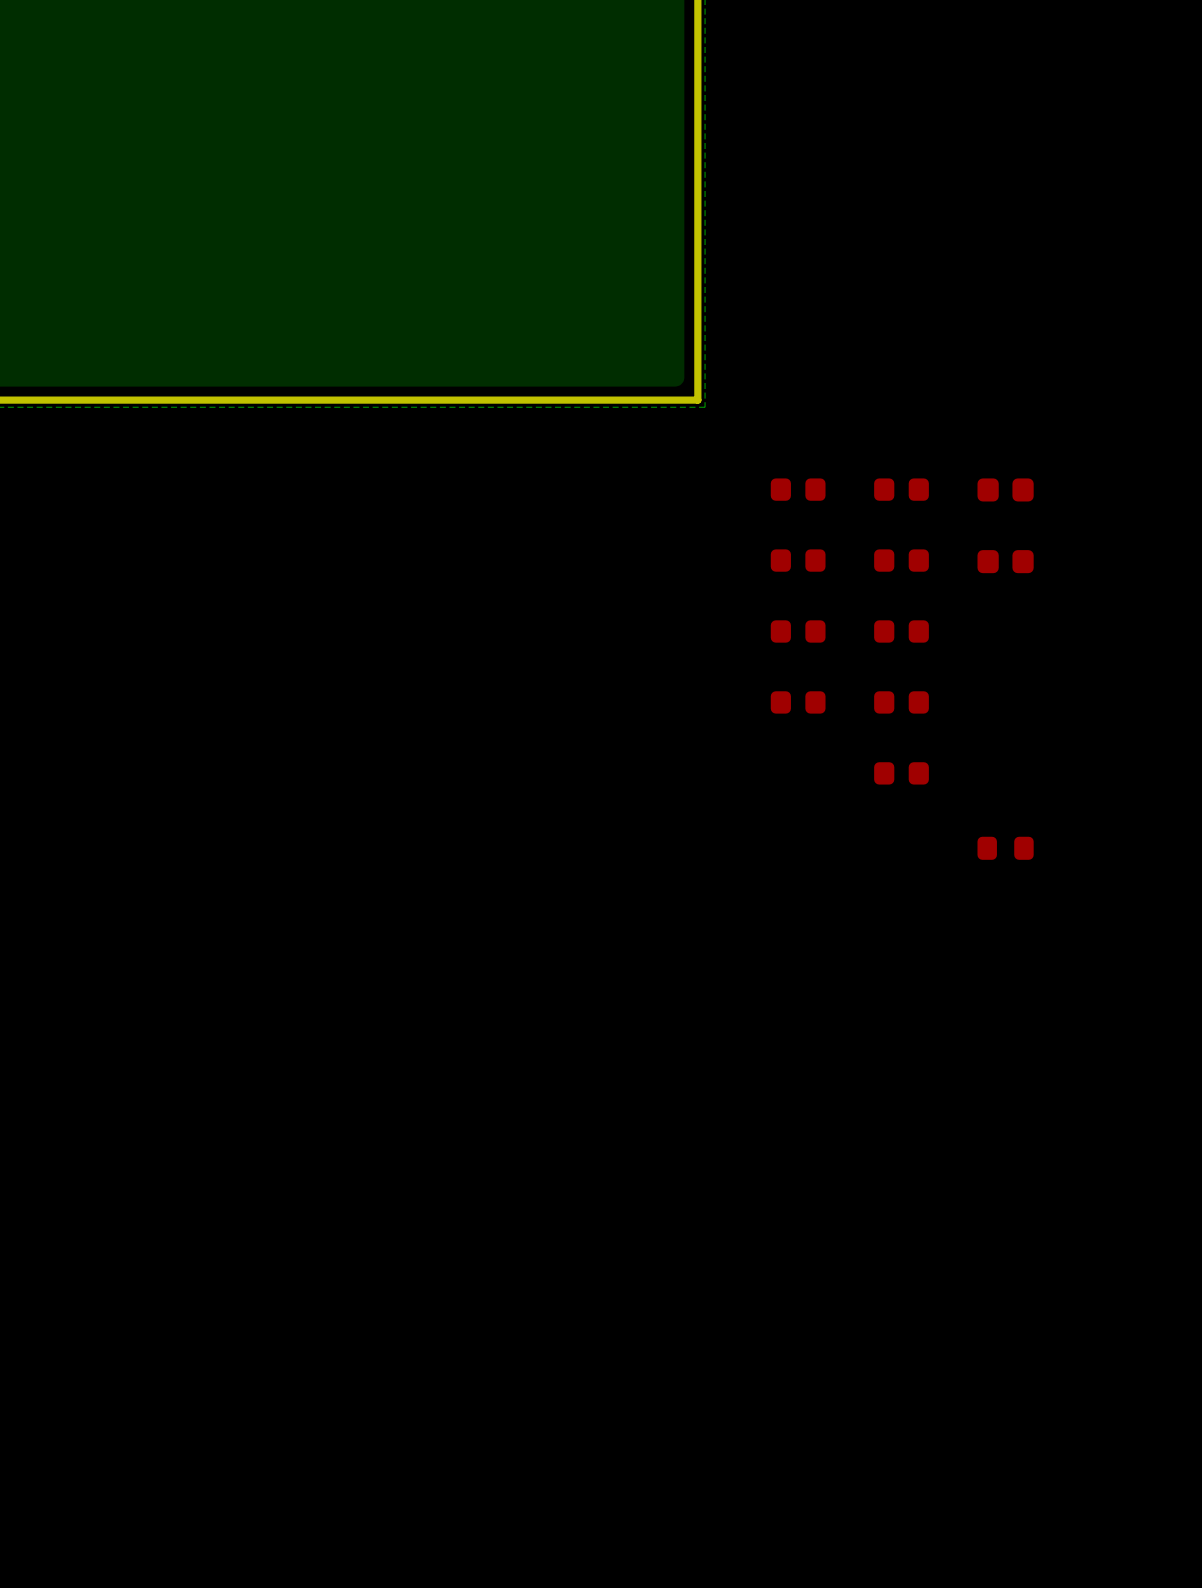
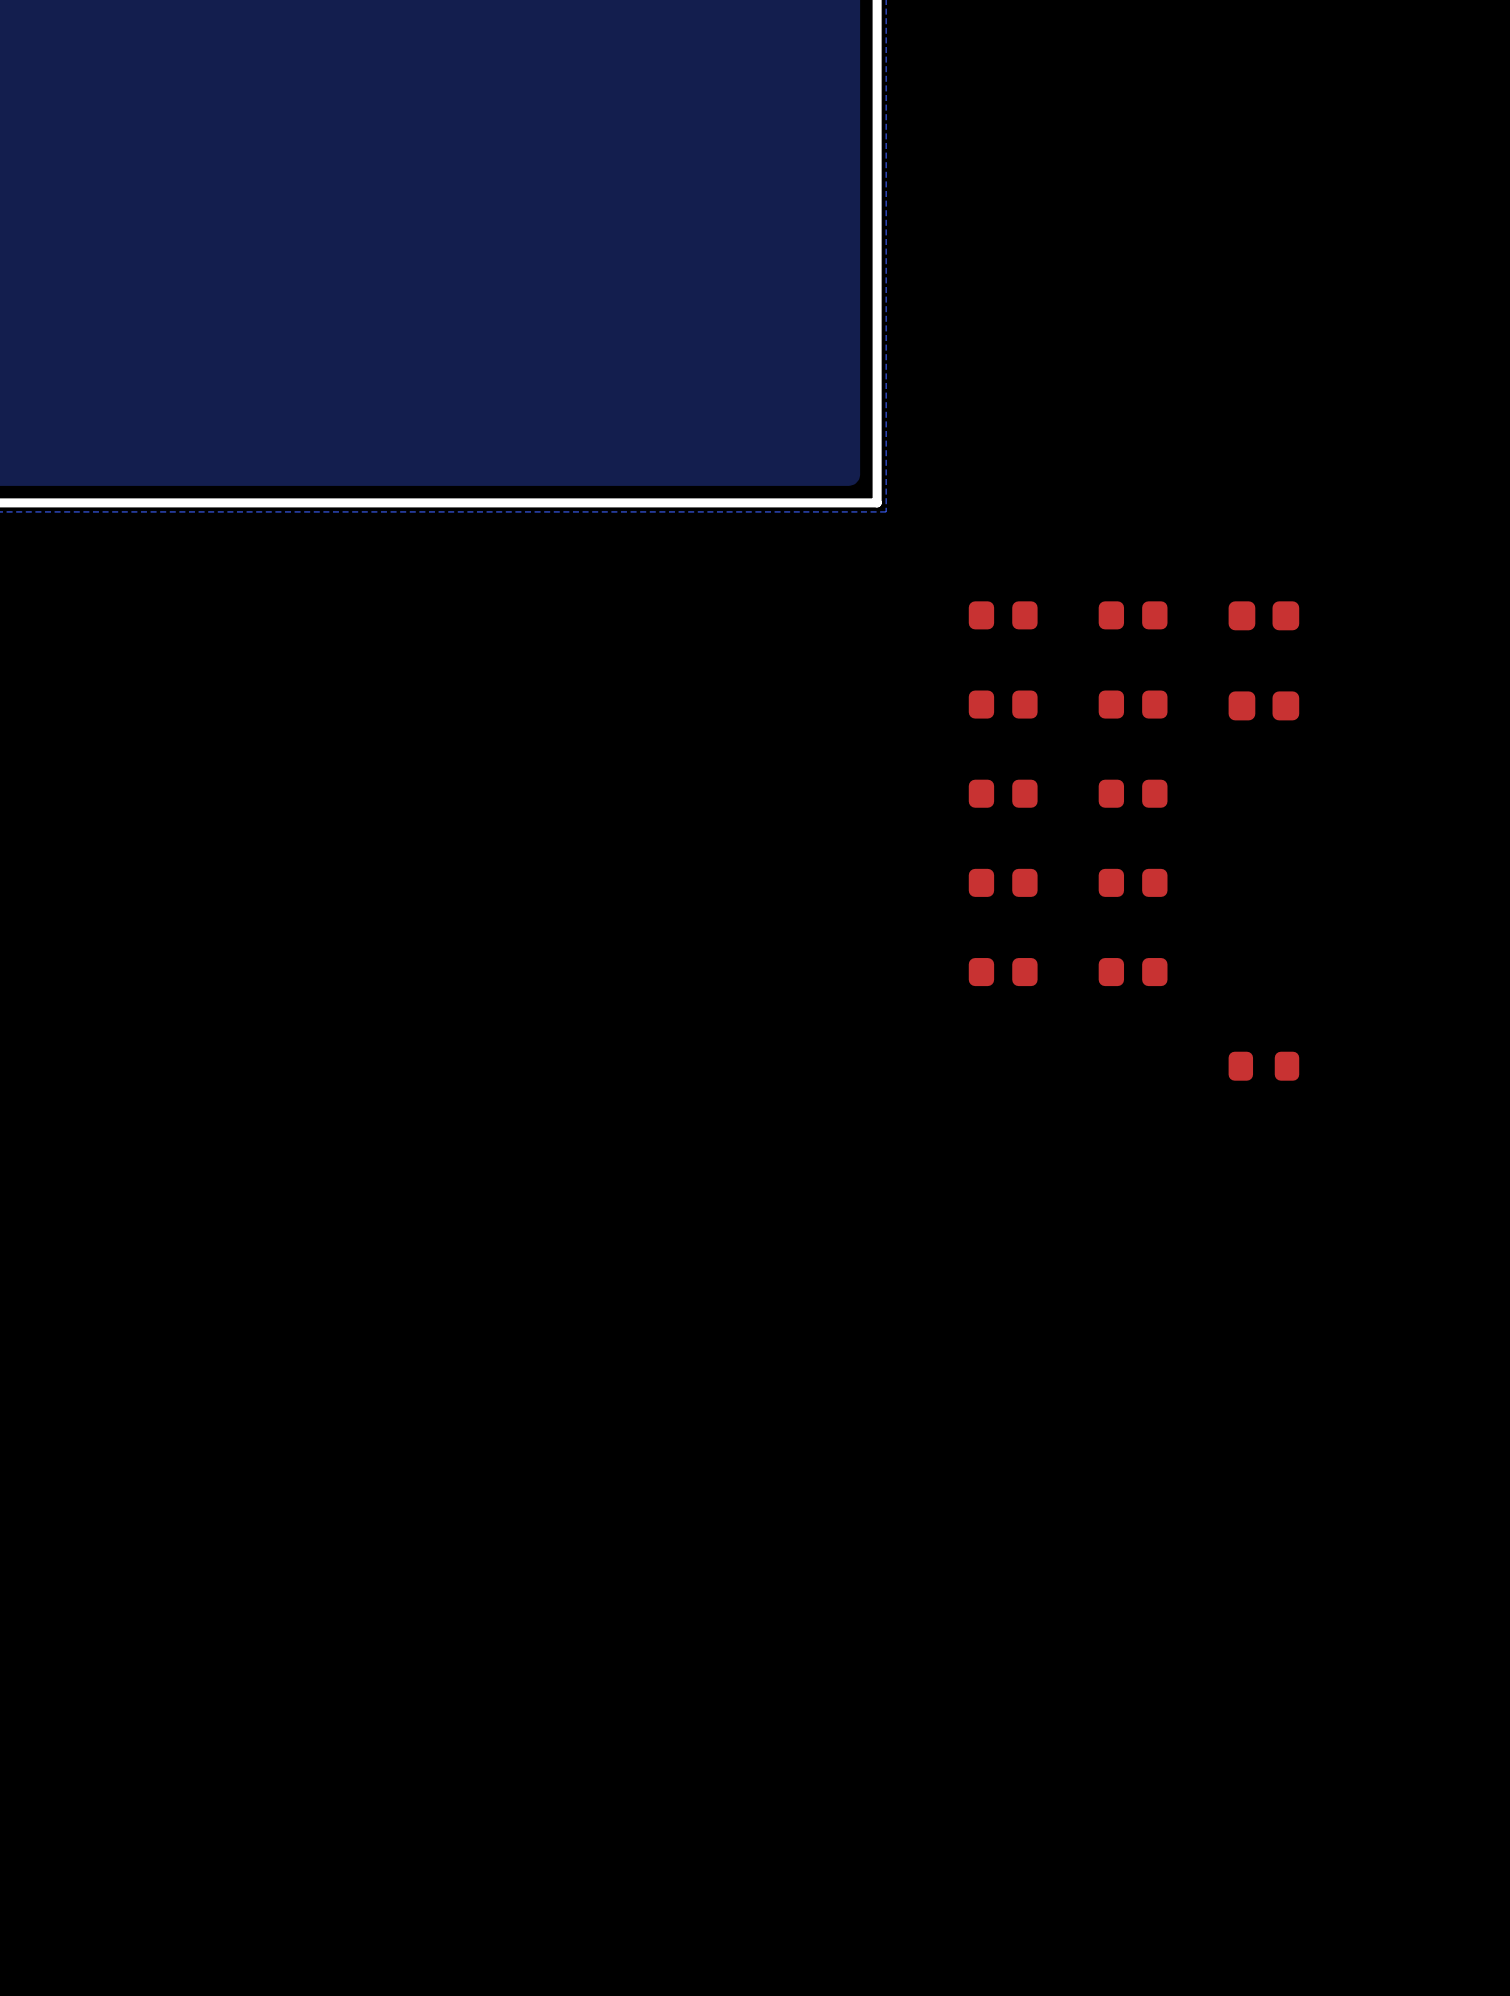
part: none -> (1003, 972)

